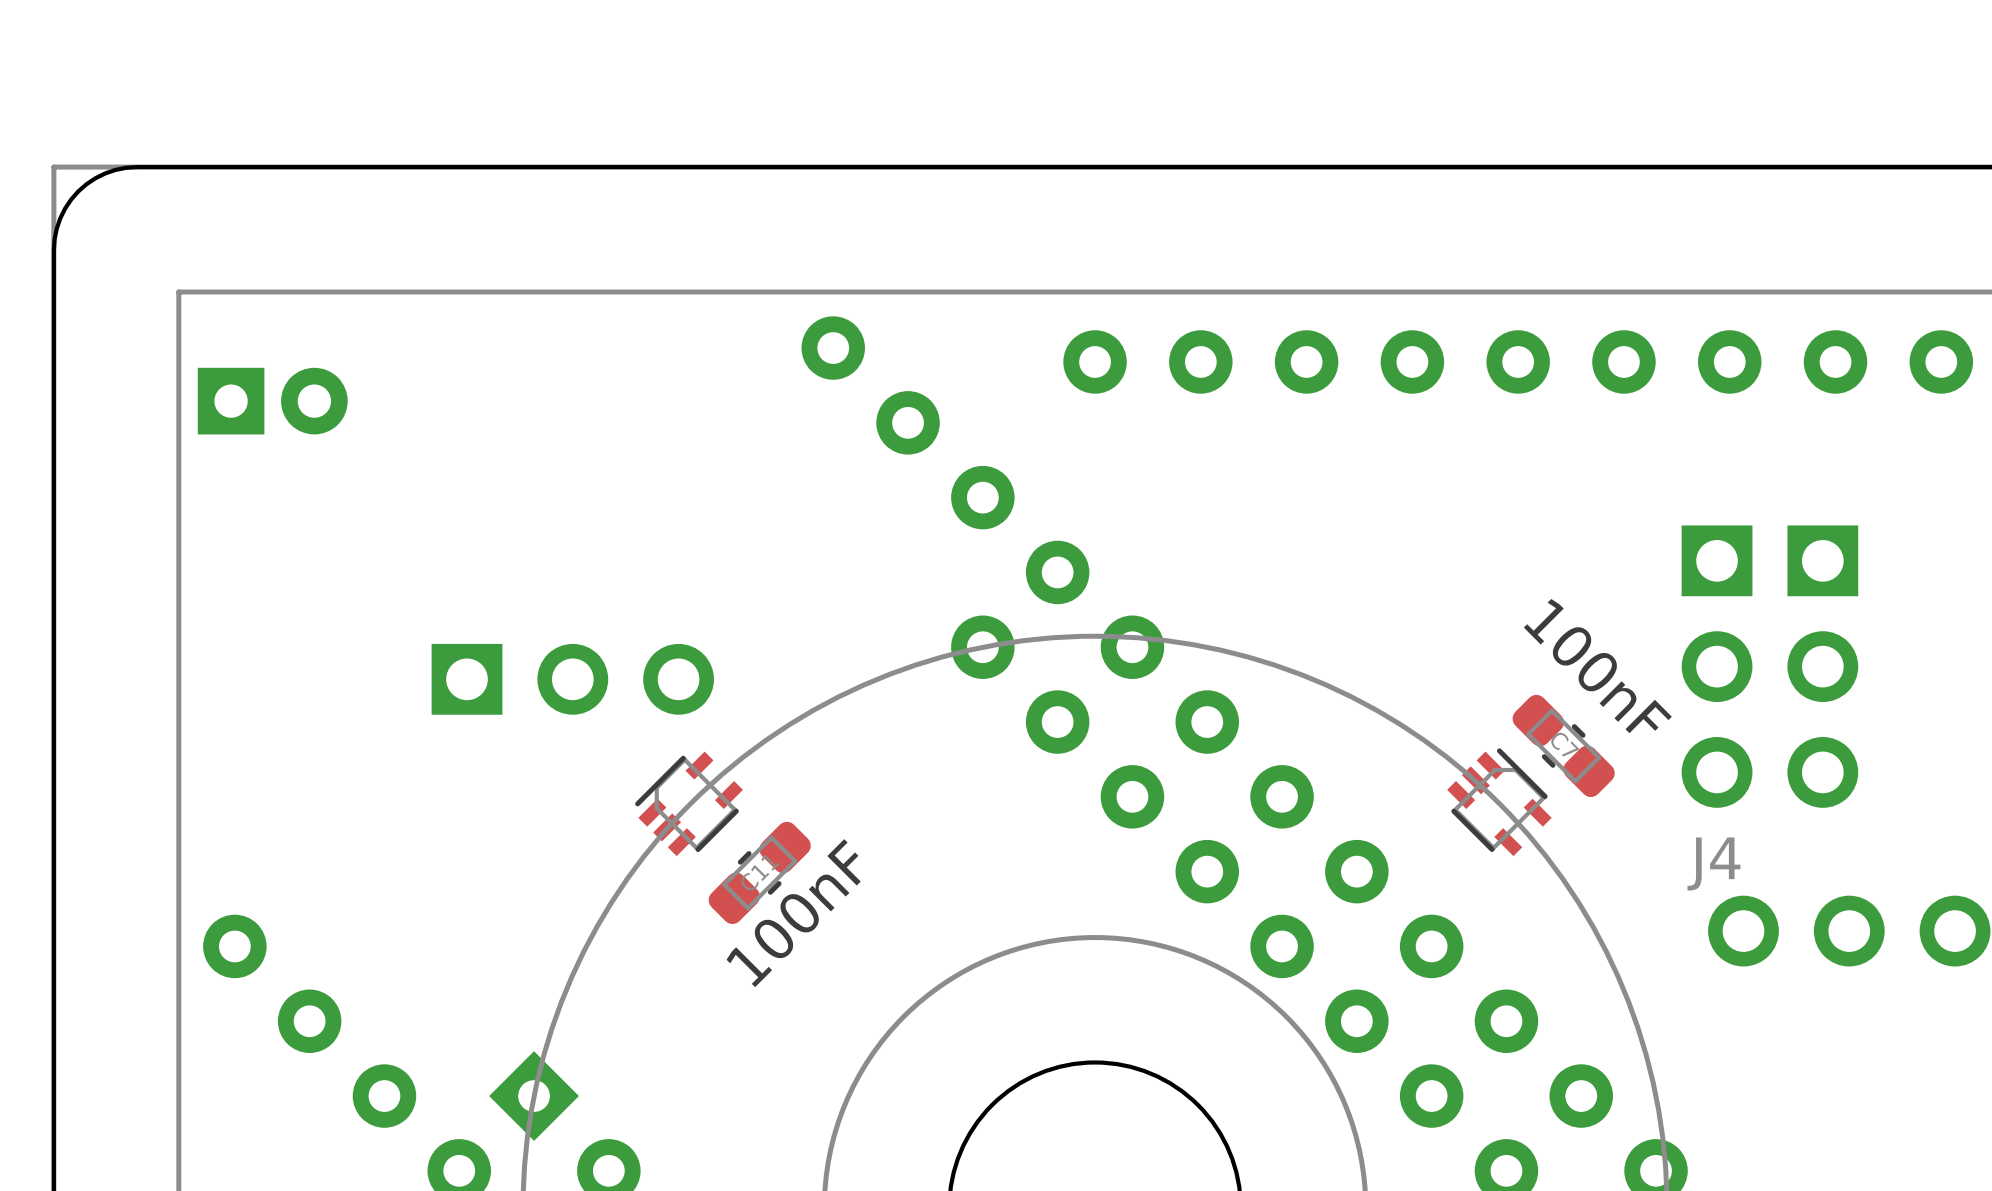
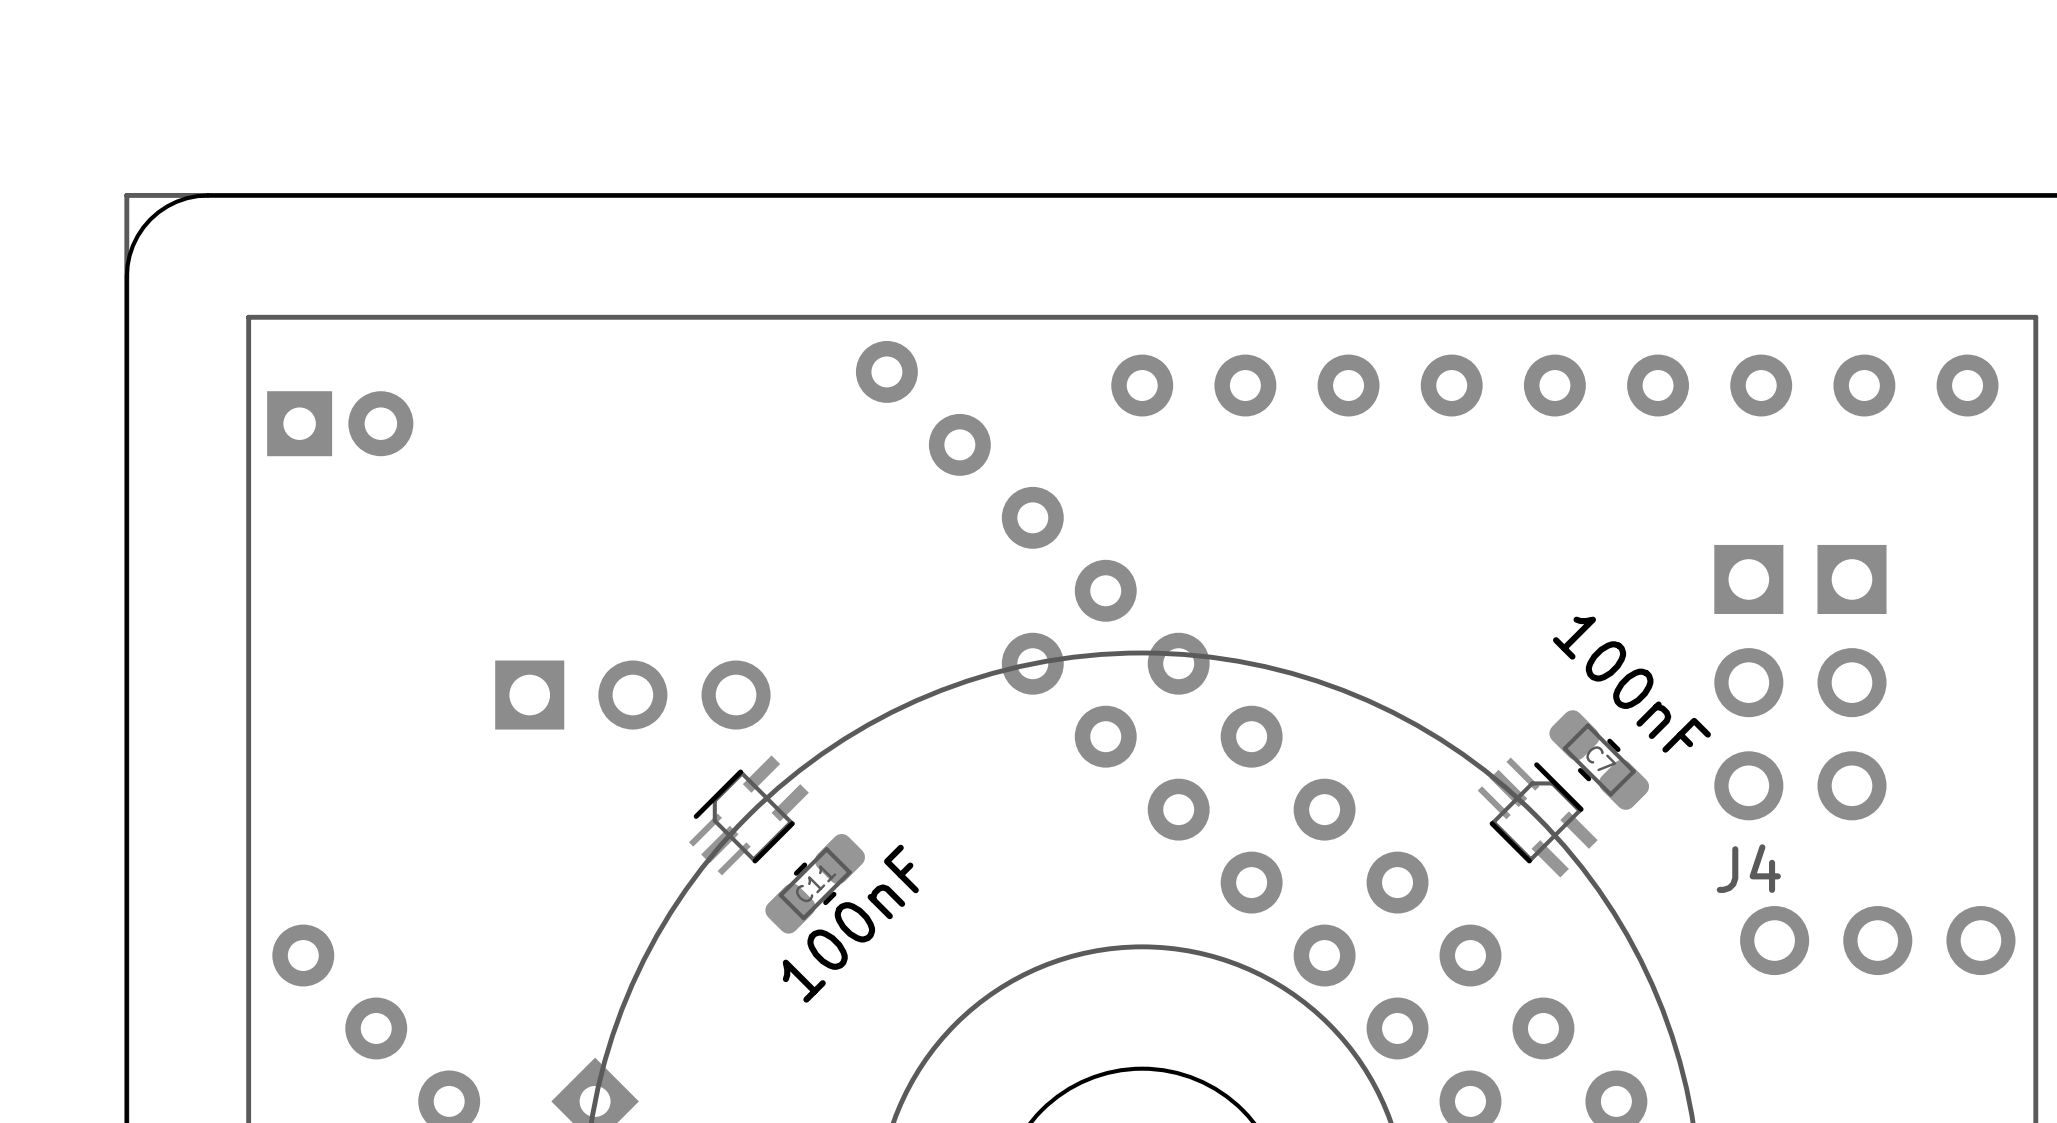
part footprint: [1447, 748, 1552, 857] -> [1477, 757, 1598, 878]
part footprint: [635, 751, 743, 857] -> [688, 755, 809, 876]

